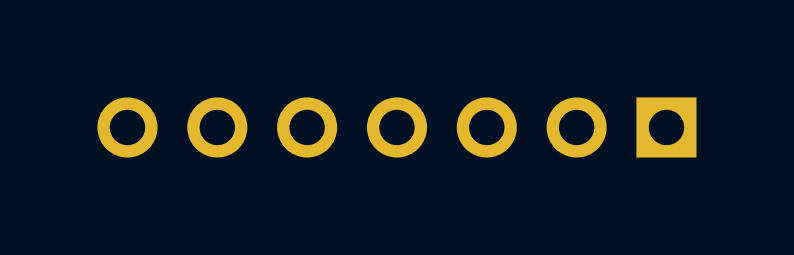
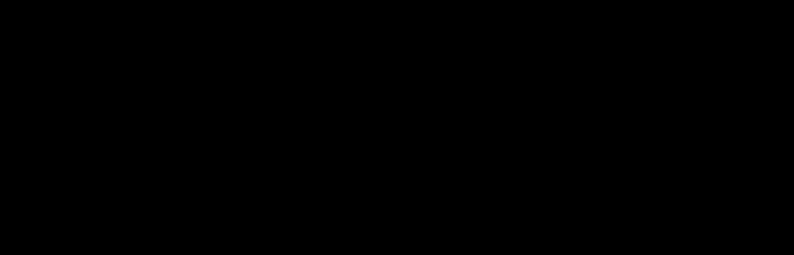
part: (396, 127) -> none

